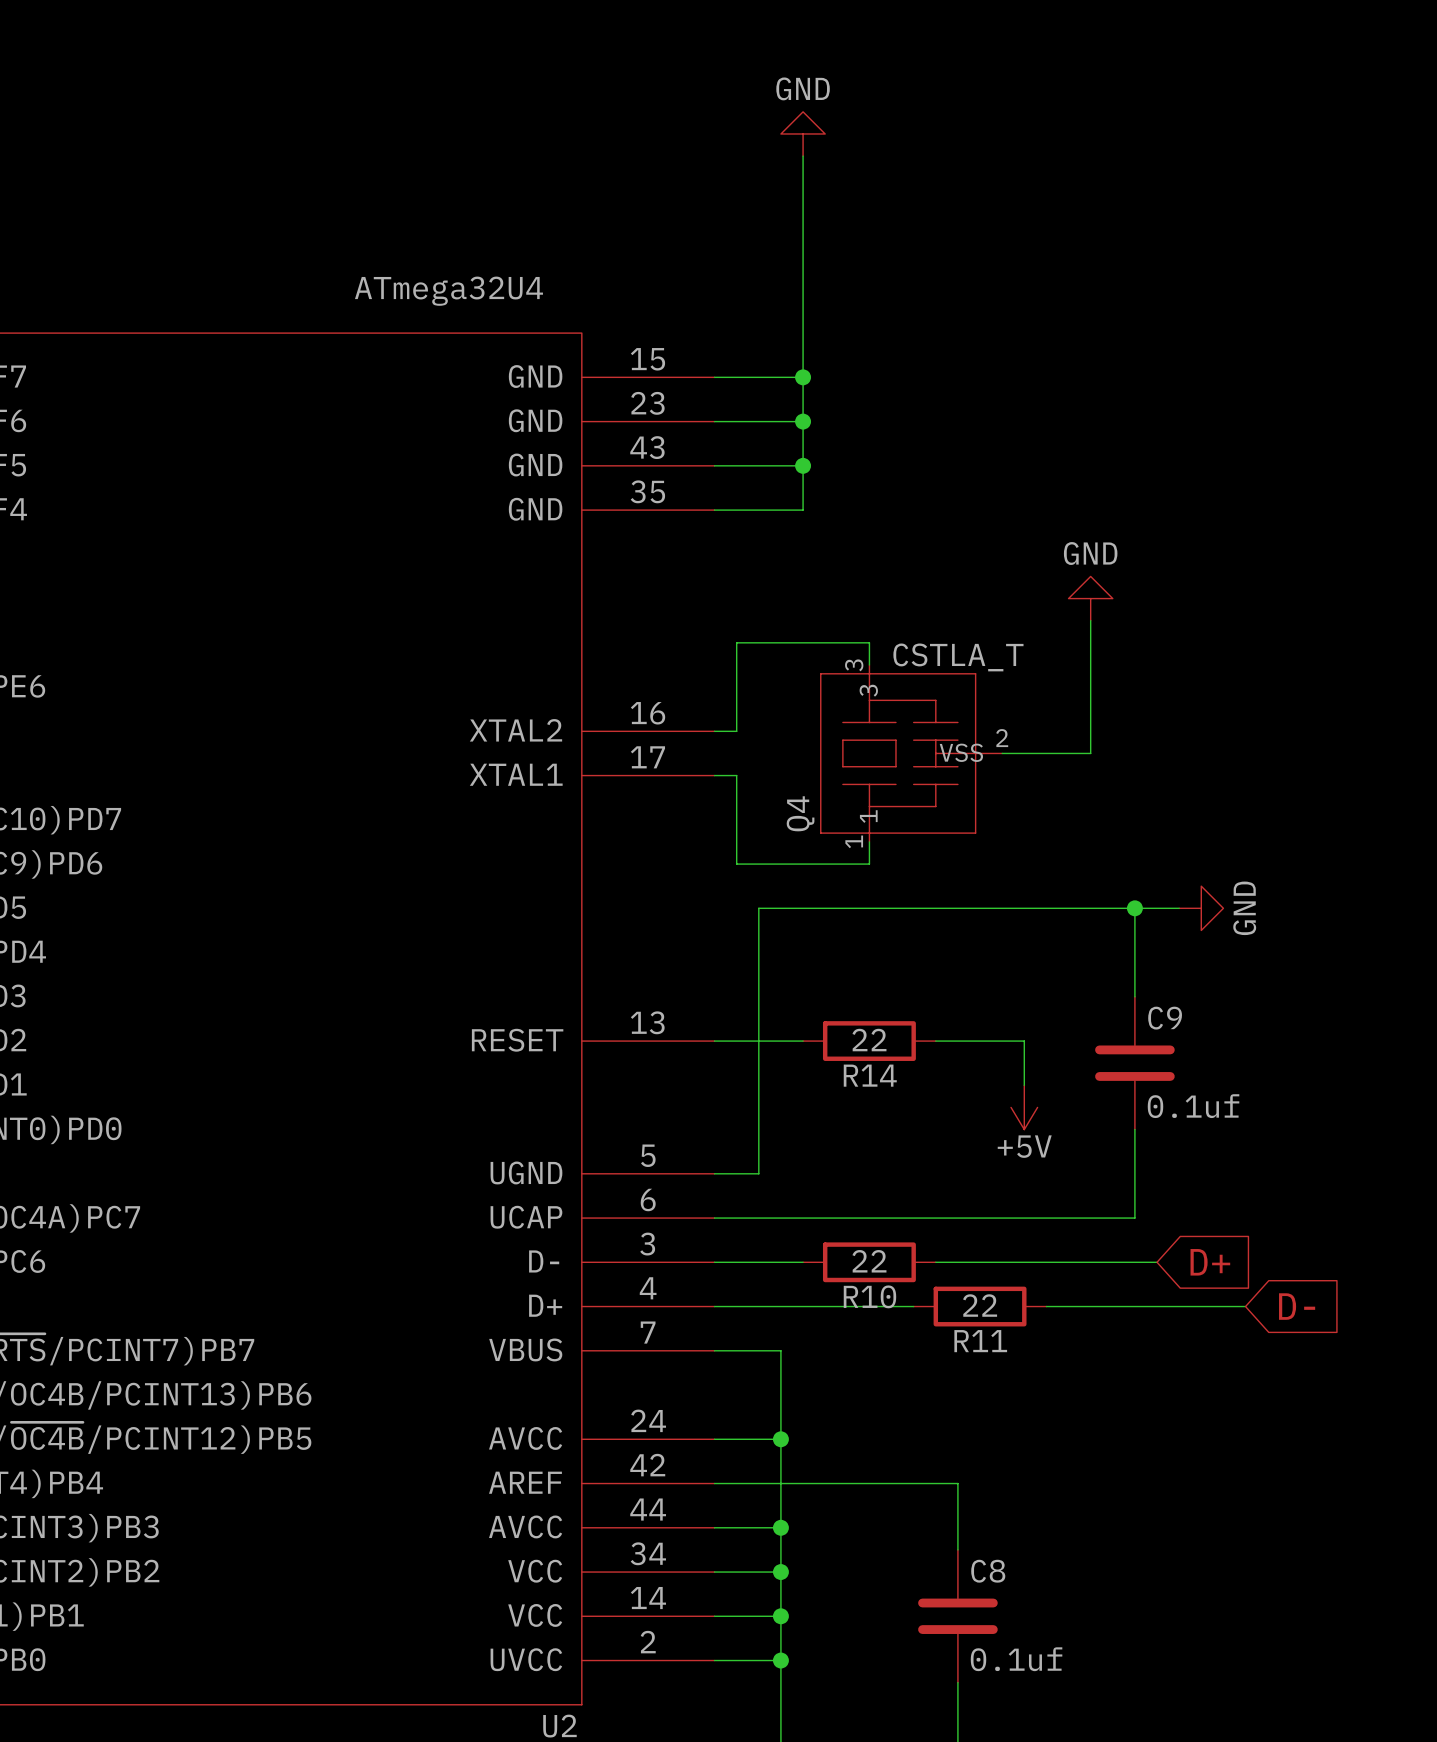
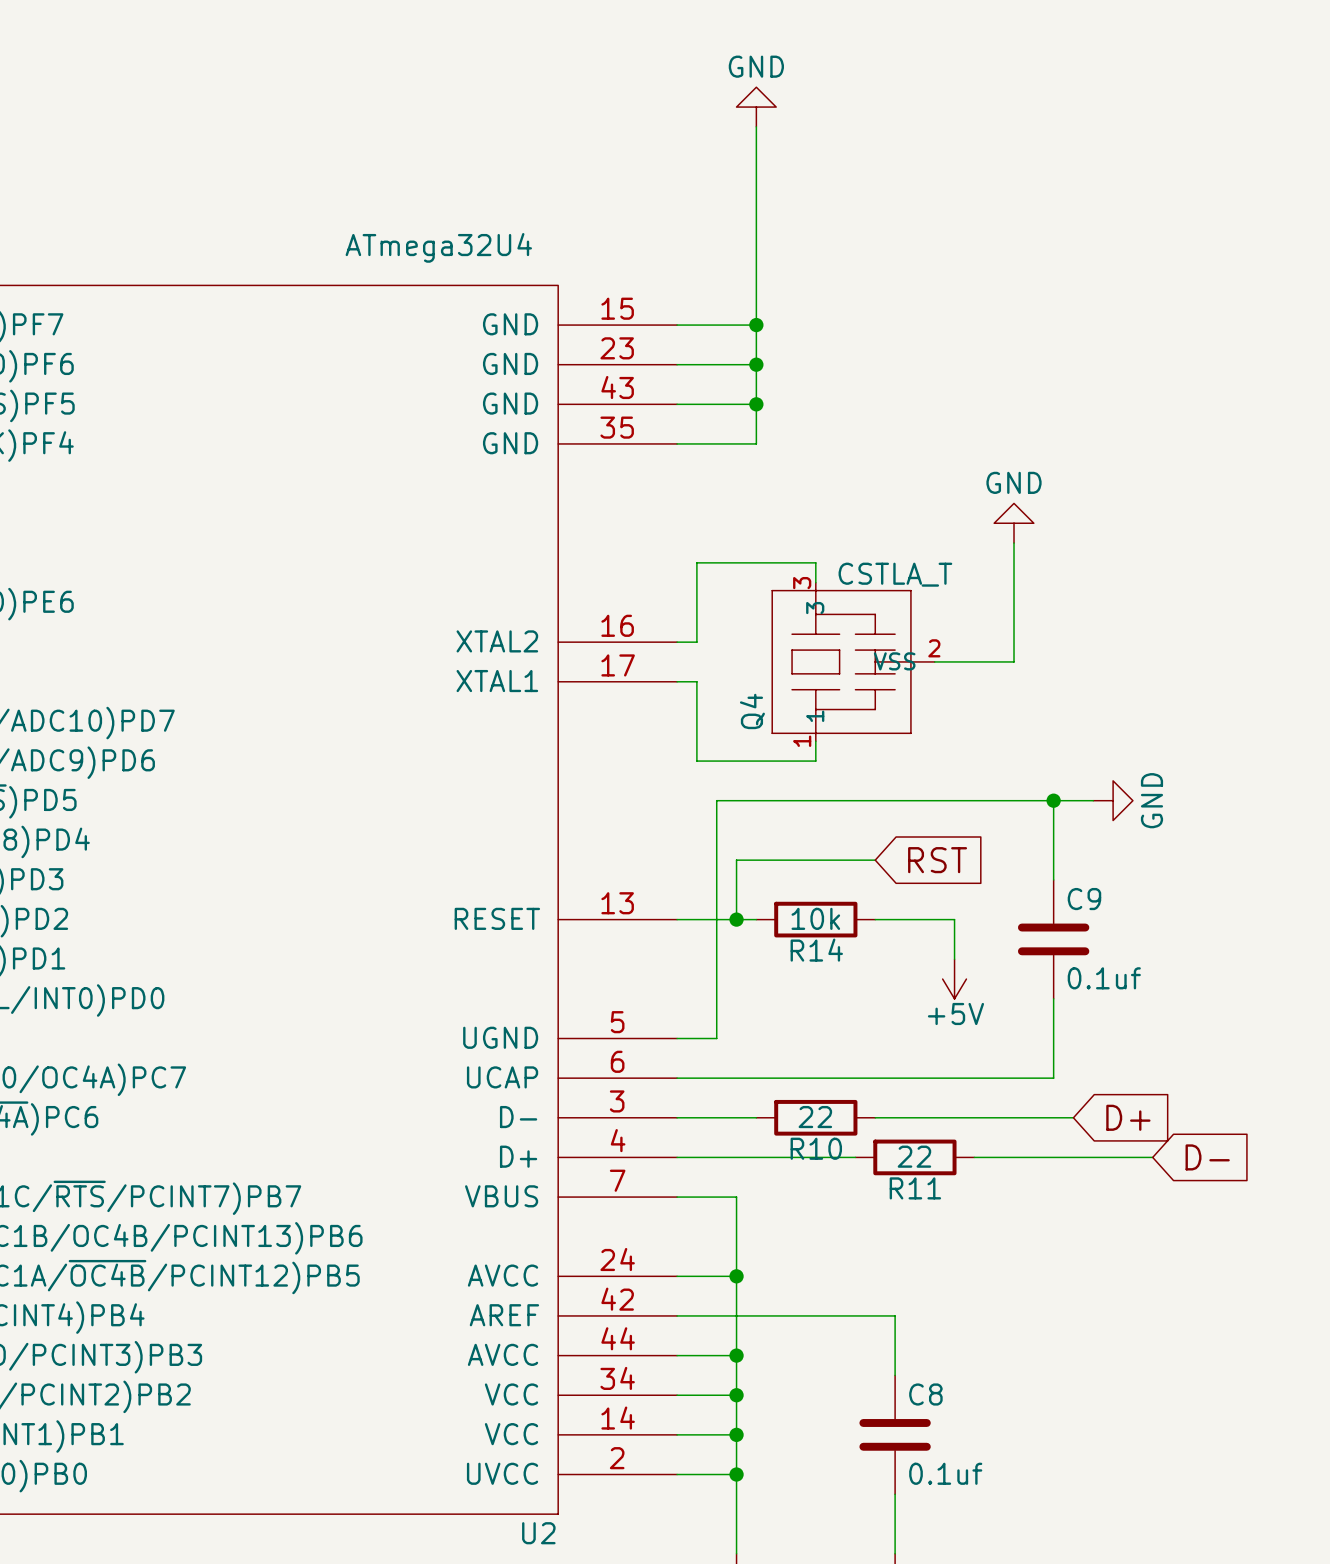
wire: none -> (875, 860) (736, 860) (736, 919)
global label: none -> RST (937, 860)
R14 value: 22 (869, 1040) -> 10k (815, 918)
junction: none -> (736, 919)

